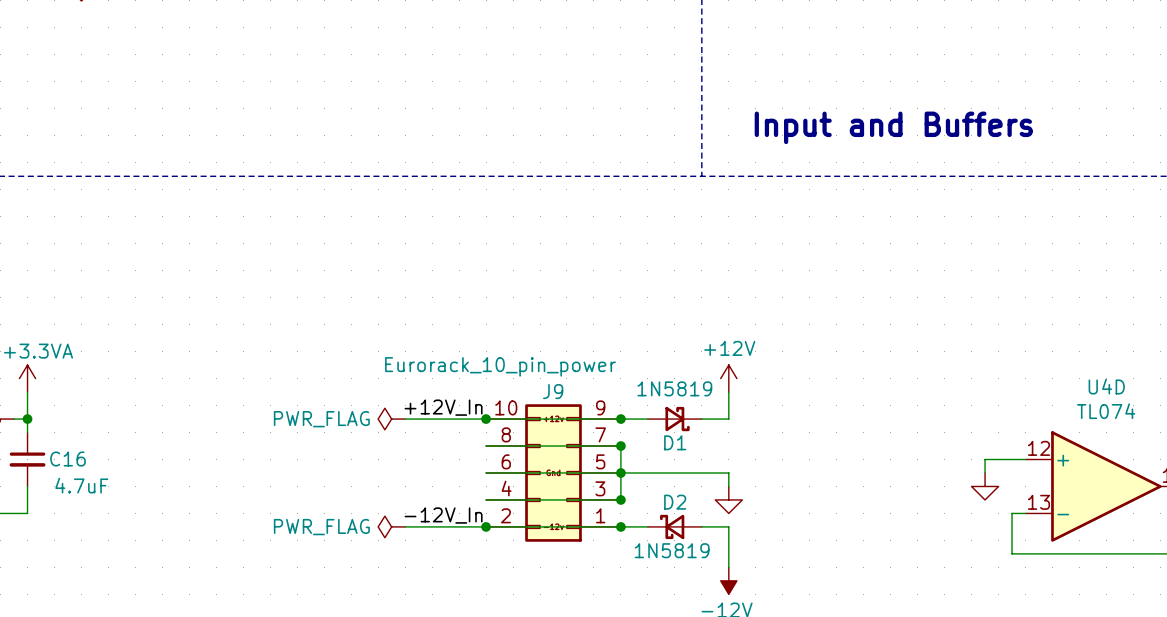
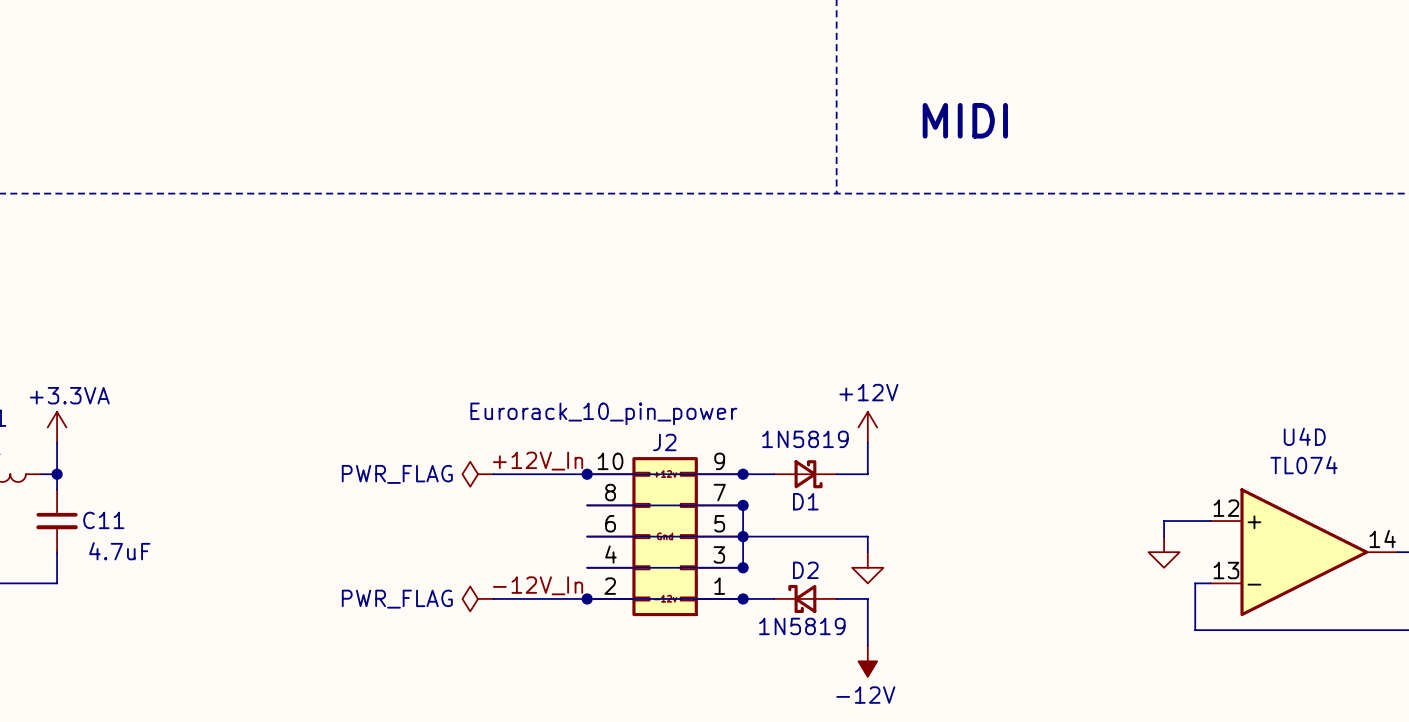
text: none -> MIDI (965, 120)
text: Input and Buffers (893, 127) -> none
J9 name: J9 (553, 391) -> J2 (664, 442)
C16 name: C16 (67, 459) -> C11 (103, 520)

